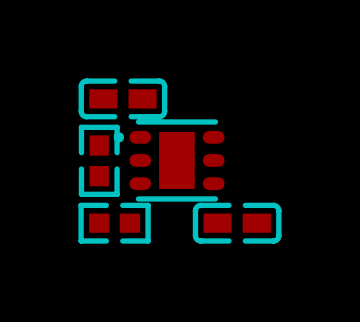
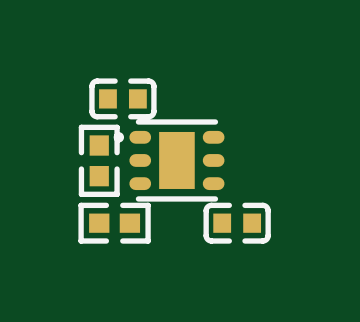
part footprint: [78, 78, 168, 120] -> [89, 78, 157, 120]
part footprint: [192, 202, 282, 244] -> [203, 202, 271, 244]

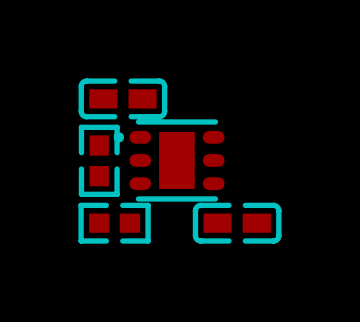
part footprint: [89, 78, 157, 120] -> [78, 78, 168, 120]
part footprint: [203, 202, 271, 244] -> [192, 202, 282, 244]

